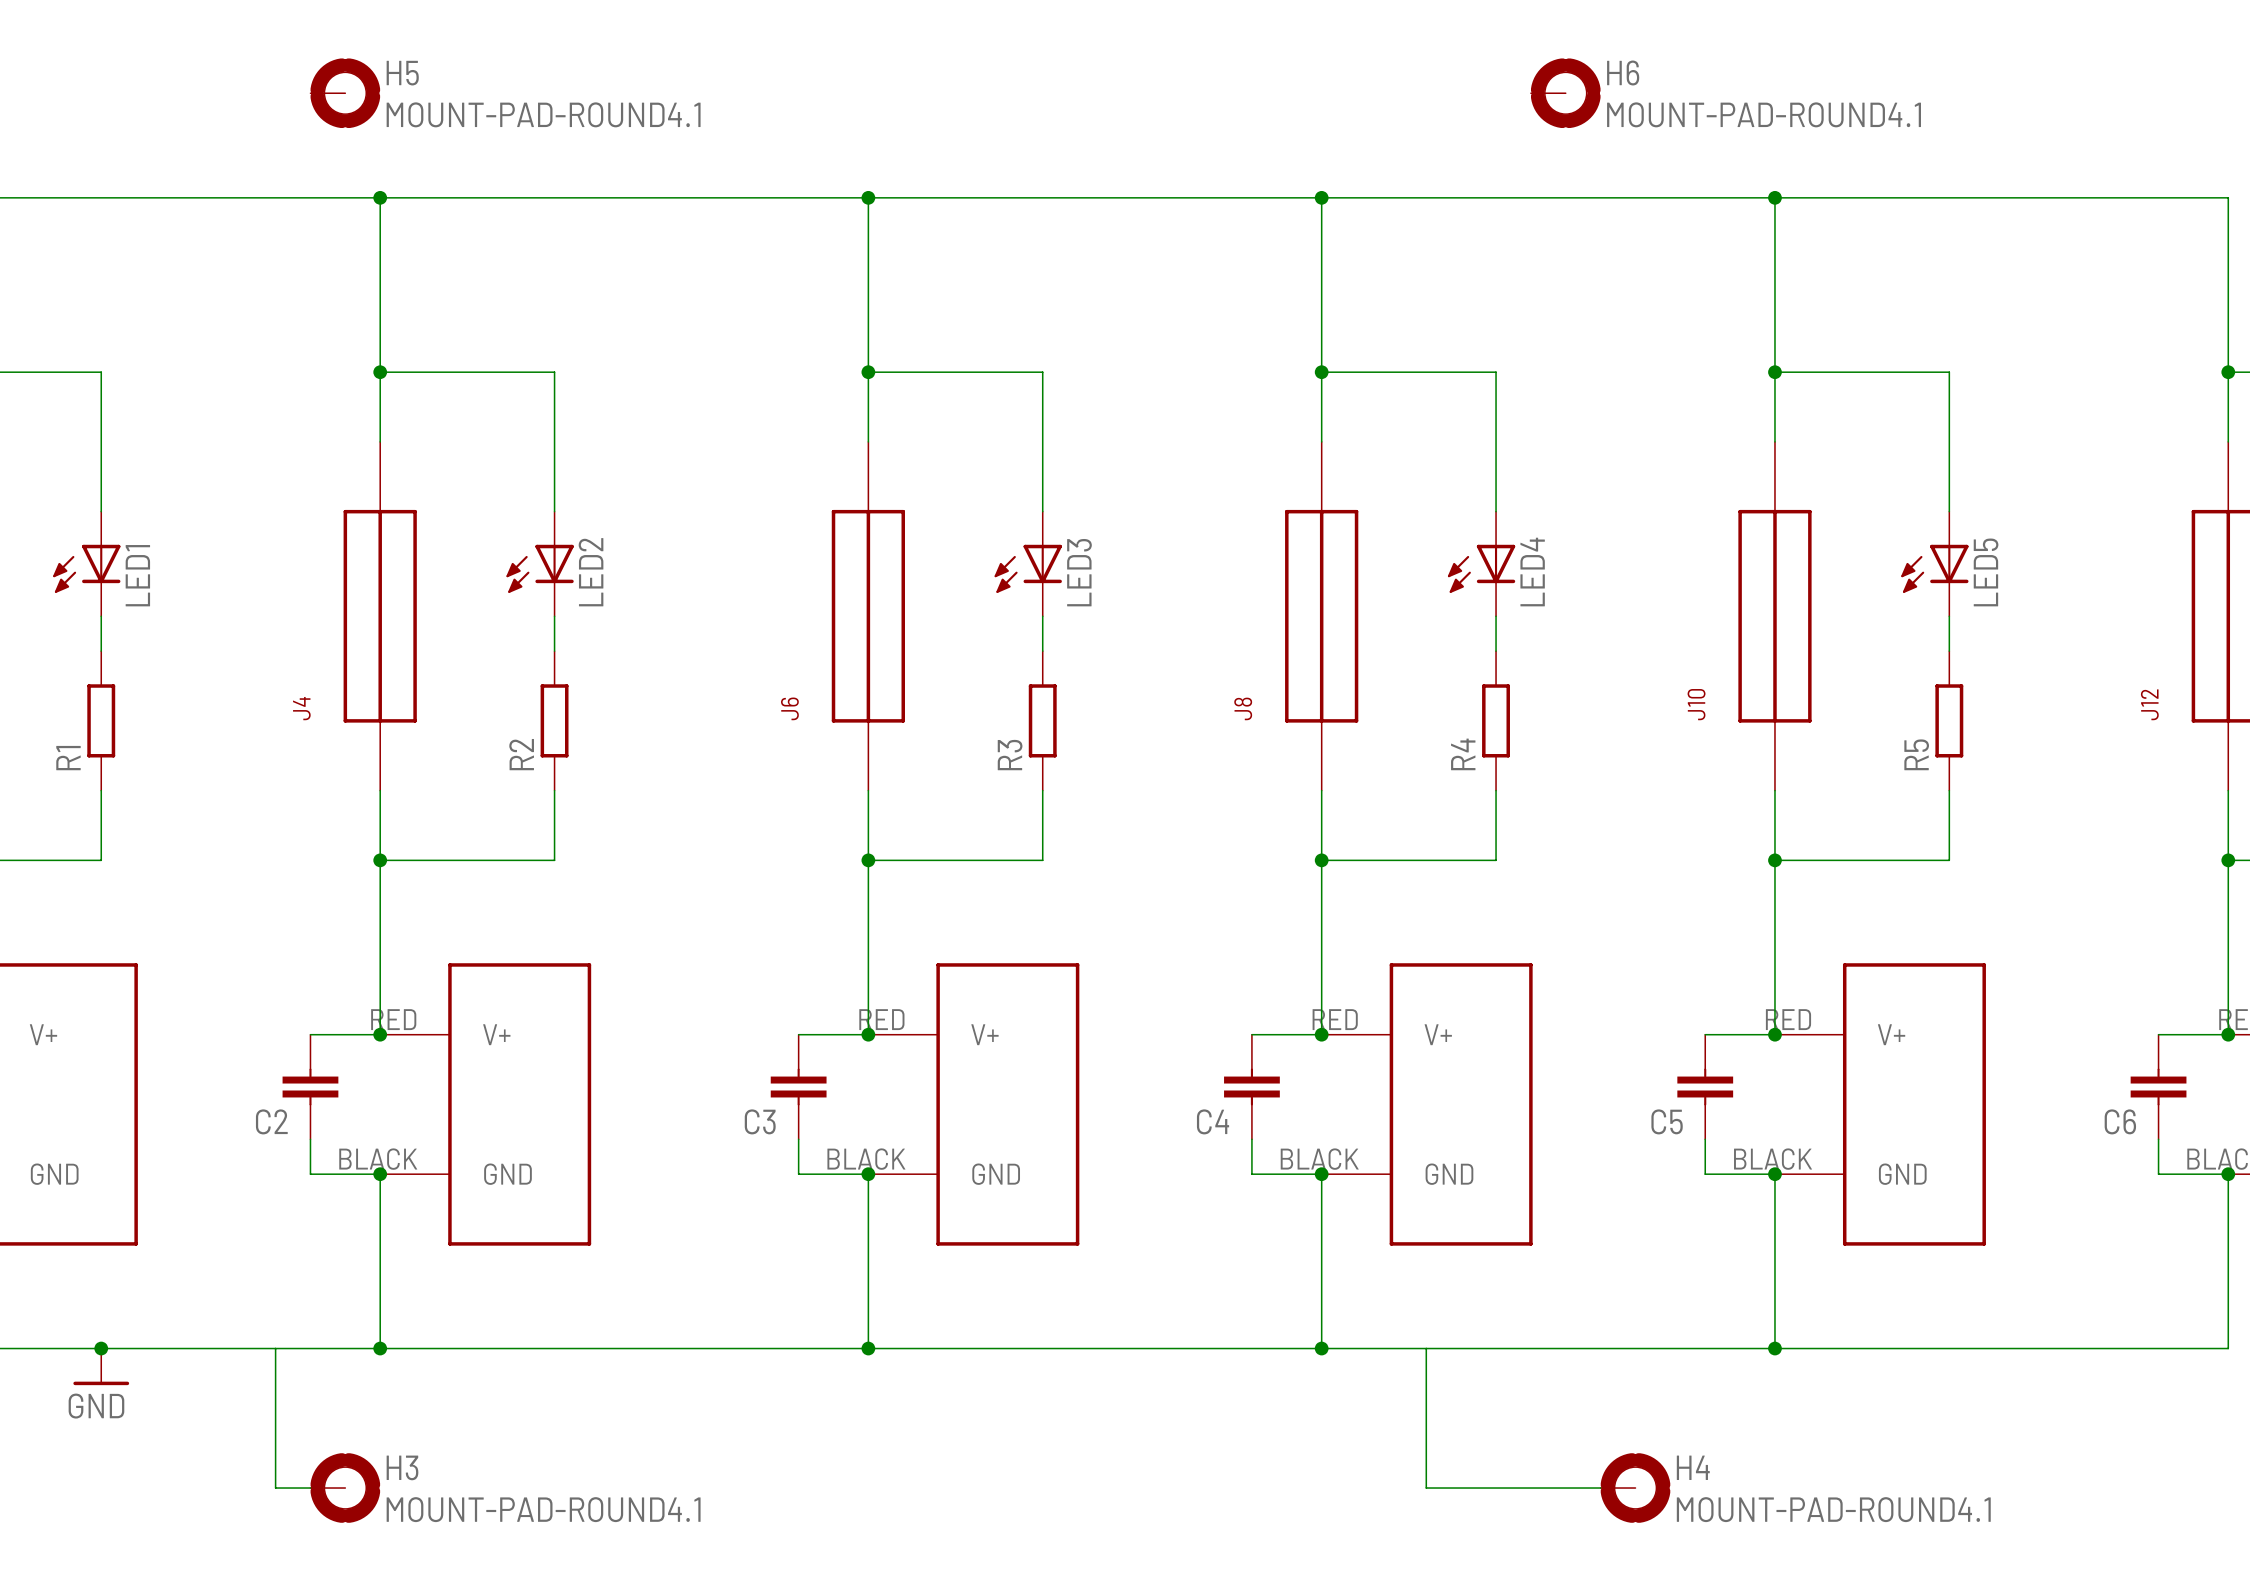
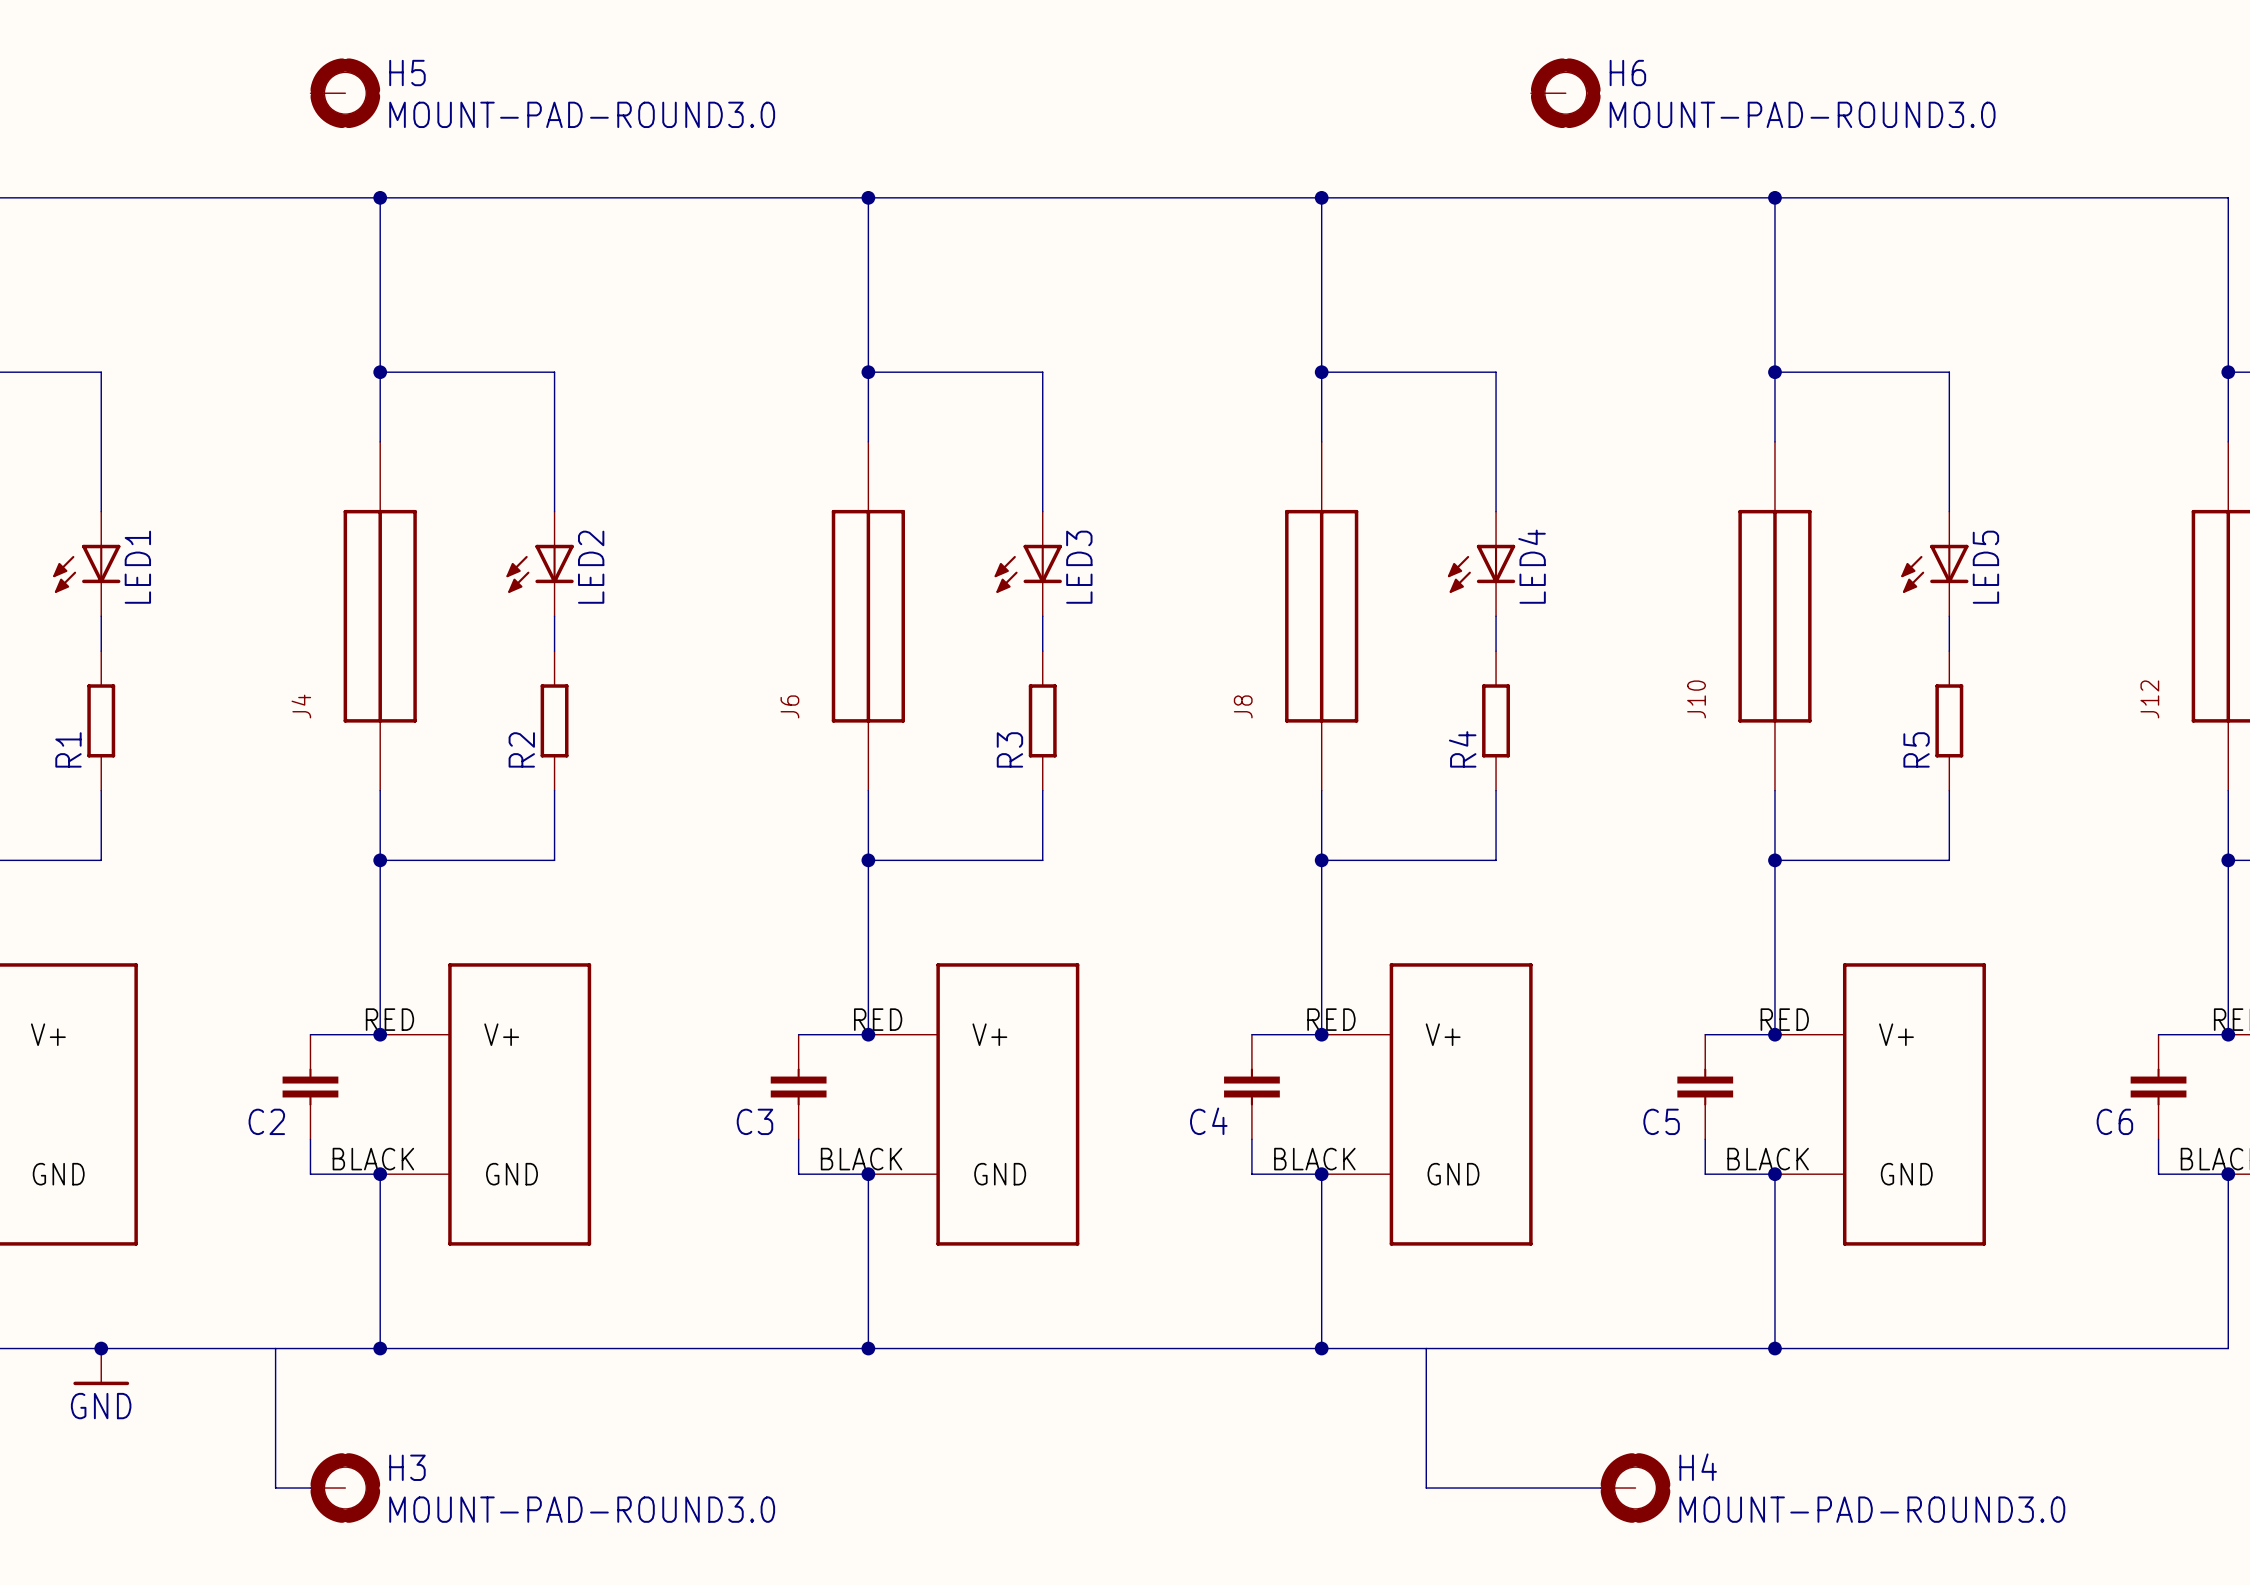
H5 value: MOUNT-PAD-ROUND4.1 (543, 114) -> MOUNT-PAD-ROUND3.0 (582, 114)
H6 value: MOUNT-PAD-ROUND4.1 (1764, 114) -> MOUNT-PAD-ROUND3.0 (1802, 114)
H3 value: MOUNT-PAD-ROUND4.1 (543, 1509) -> MOUNT-PAD-ROUND3.0 (582, 1509)
H4 value: MOUNT-PAD-ROUND4.1 (1833, 1509) -> MOUNT-PAD-ROUND3.0 (1872, 1509)

